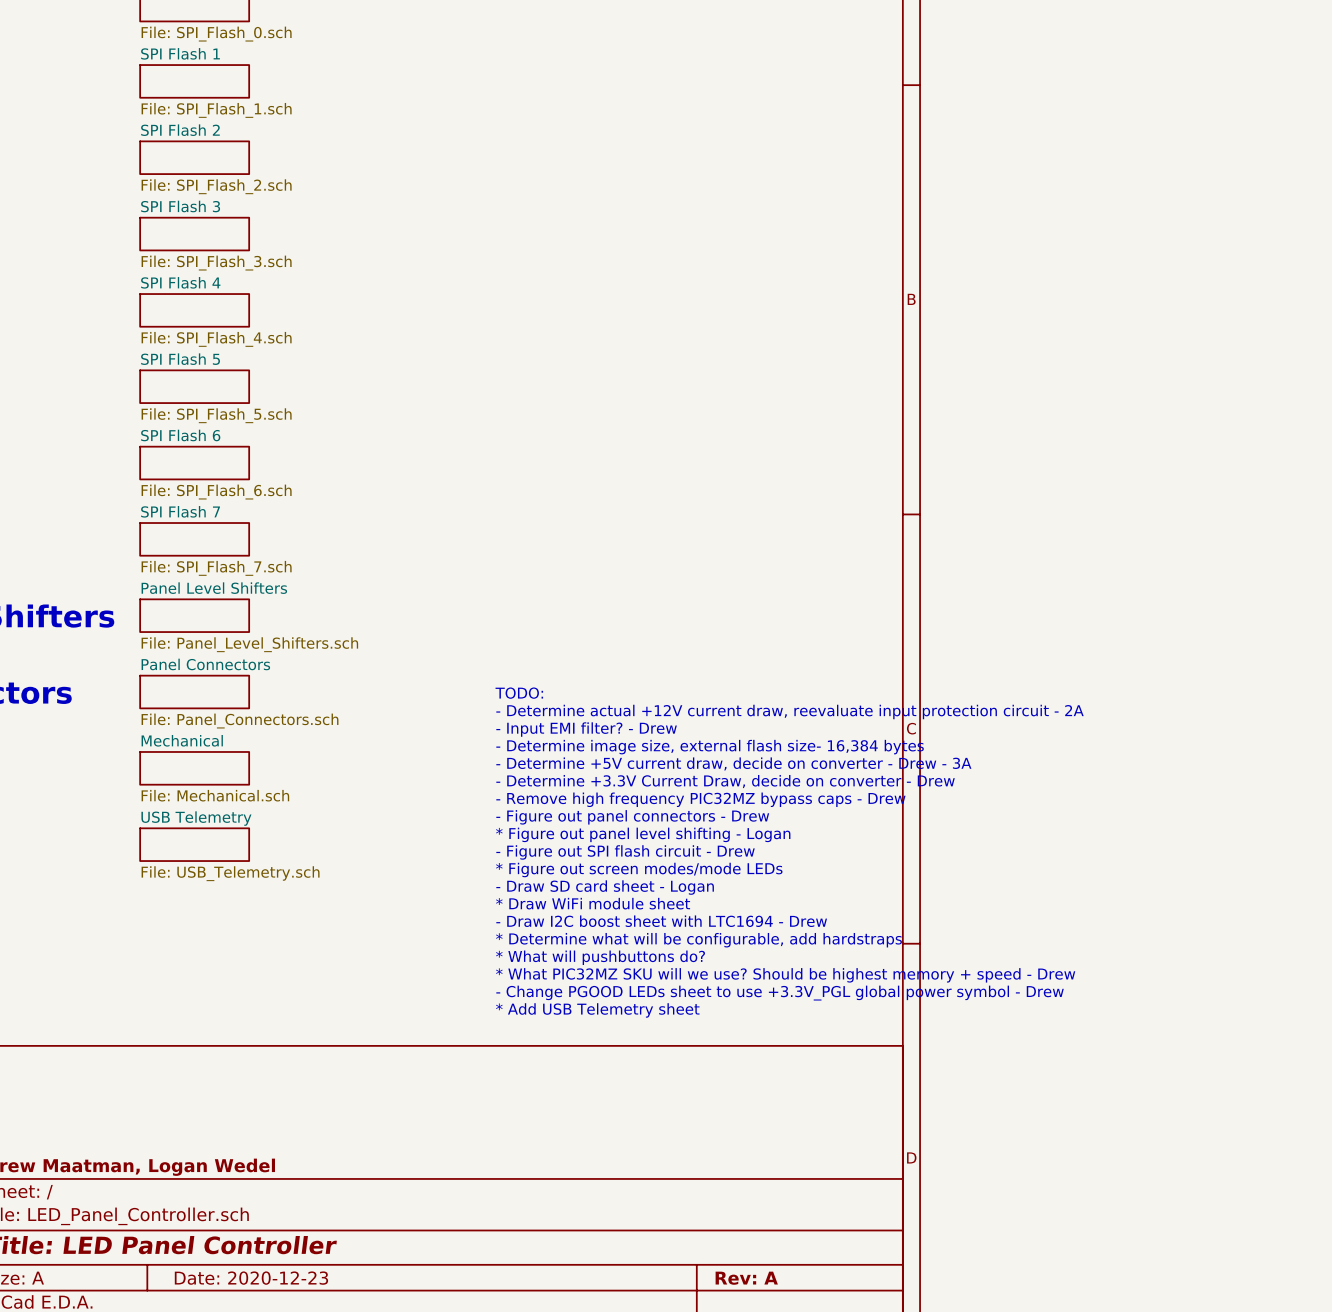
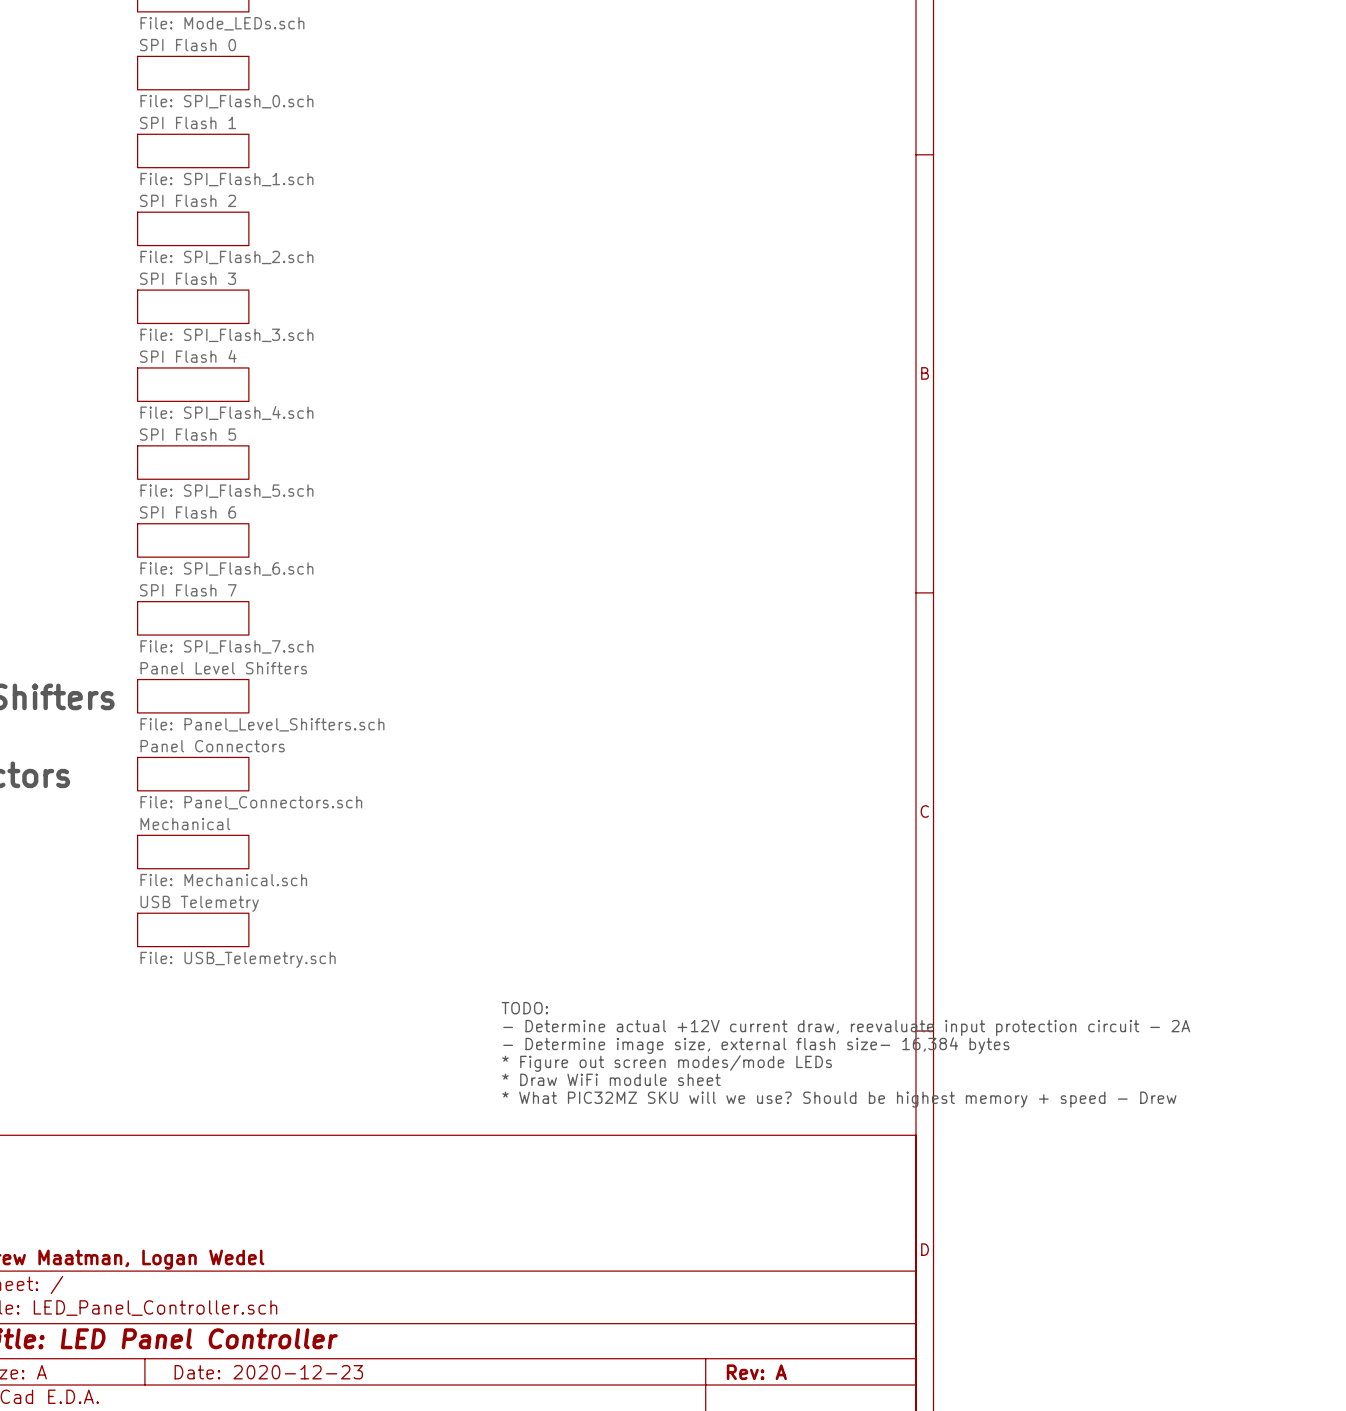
text: TODO: (519, 693) -> none
text: - Determine actual +12V current draw, reevaluate input protection circuit - 2A (790, 711) -> none
text: - Input EMI filter? - Drew (586, 729) -> none
text: - Determine image size, external flash size- 16,384 bytes (710, 747) -> none
text: - Determine +5V current draw, decide on converter - Drew - 3A (733, 763) -> none
text: - Determine +3.3V Current Draw, decide on converter - Drew (725, 781) -> none
text: - Remove high frequency PIC32MZ bypass caps - Drew (700, 799) -> none
text: - Figure out panel connectors - Drew (632, 817) -> none
text: * Figure out panel level shifting - Logan (643, 834) -> none
text: - Figure out SPI flash circuit - Drew (625, 852) -> none
text: * Figure out screen modes/mode LEDs (639, 869) -> none
text: - Draw SD card sheet - Logan (605, 887) -> none
text: * Draw WiFi module sheet (593, 903) -> none
text: - Draw I2C boost sheet with LTC1694 - Drew (661, 921) -> TODO: (524, 1008)
text: * Determine what will be configurable, add hardstraps (698, 940) -> - Determine actual +12V current draw, reevaluate input protection circuit - 2A (846, 1027)
text: * What will pushbuttons do? (600, 957) -> - Determine image size, external flash size- 16,384 bytes (756, 1045)
text: * What PIC32MZ SKU will we use? Should be highest memory + speed - Drew (785, 975) -> * Figure out screen modes/mode LEDs (667, 1063)
text: - Change PGOOD LEDs sheet to use +3.3V_PGL global power symbol - Drew (780, 993) -> * Draw WiFi module sheet (611, 1079)
text: * Add USB Telemetry sheet (597, 1010) -> * What PIC32MZ SKU will we use? Should be highest memory + speed - Drew (839, 1099)

